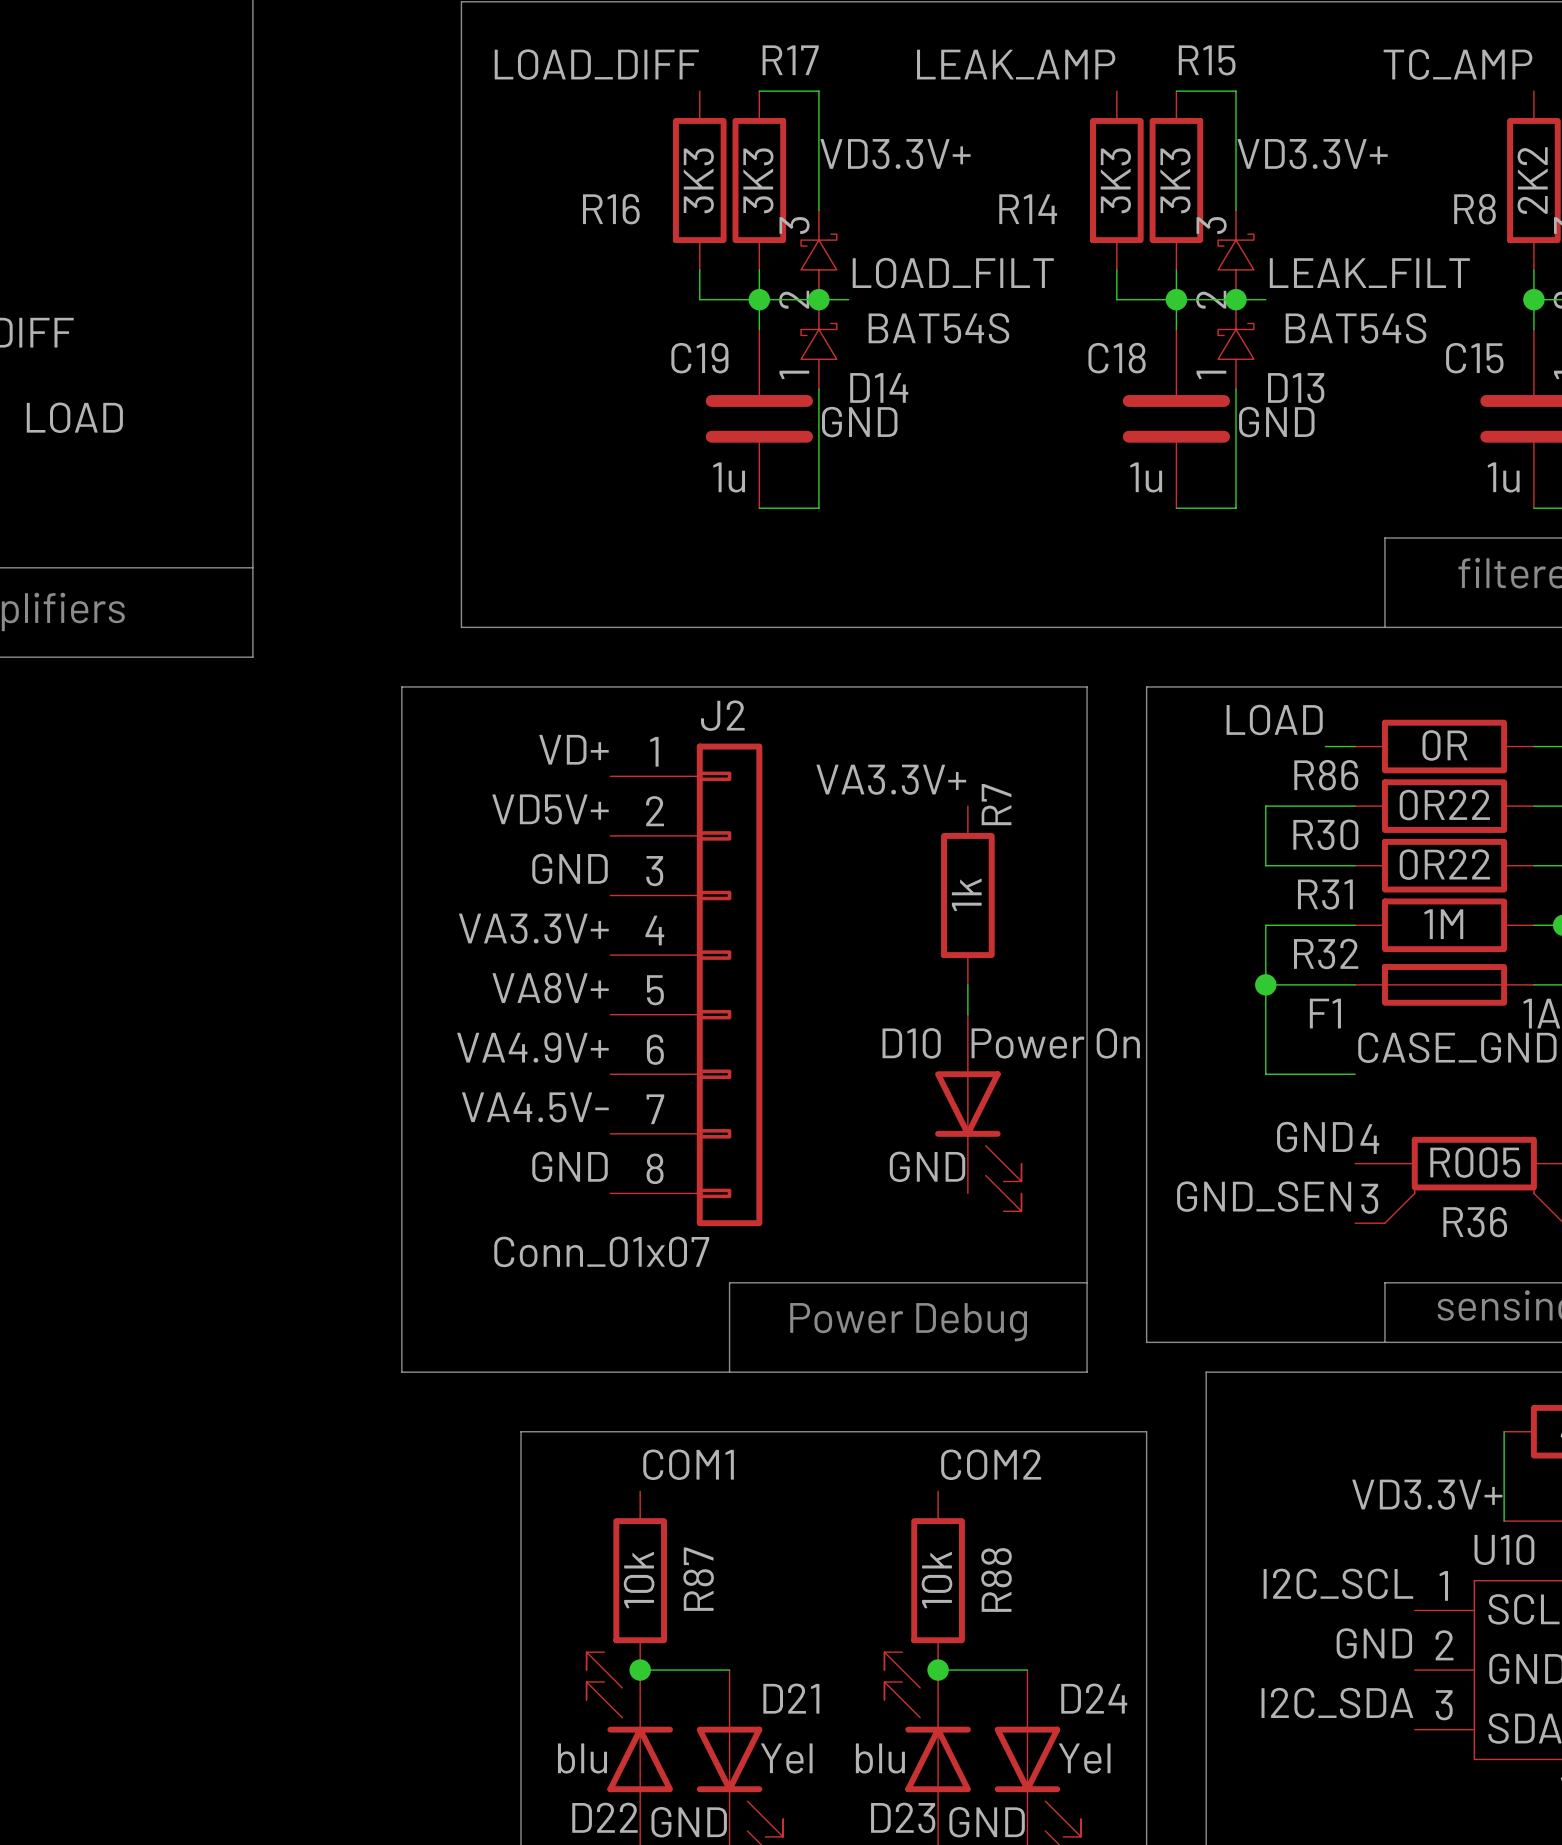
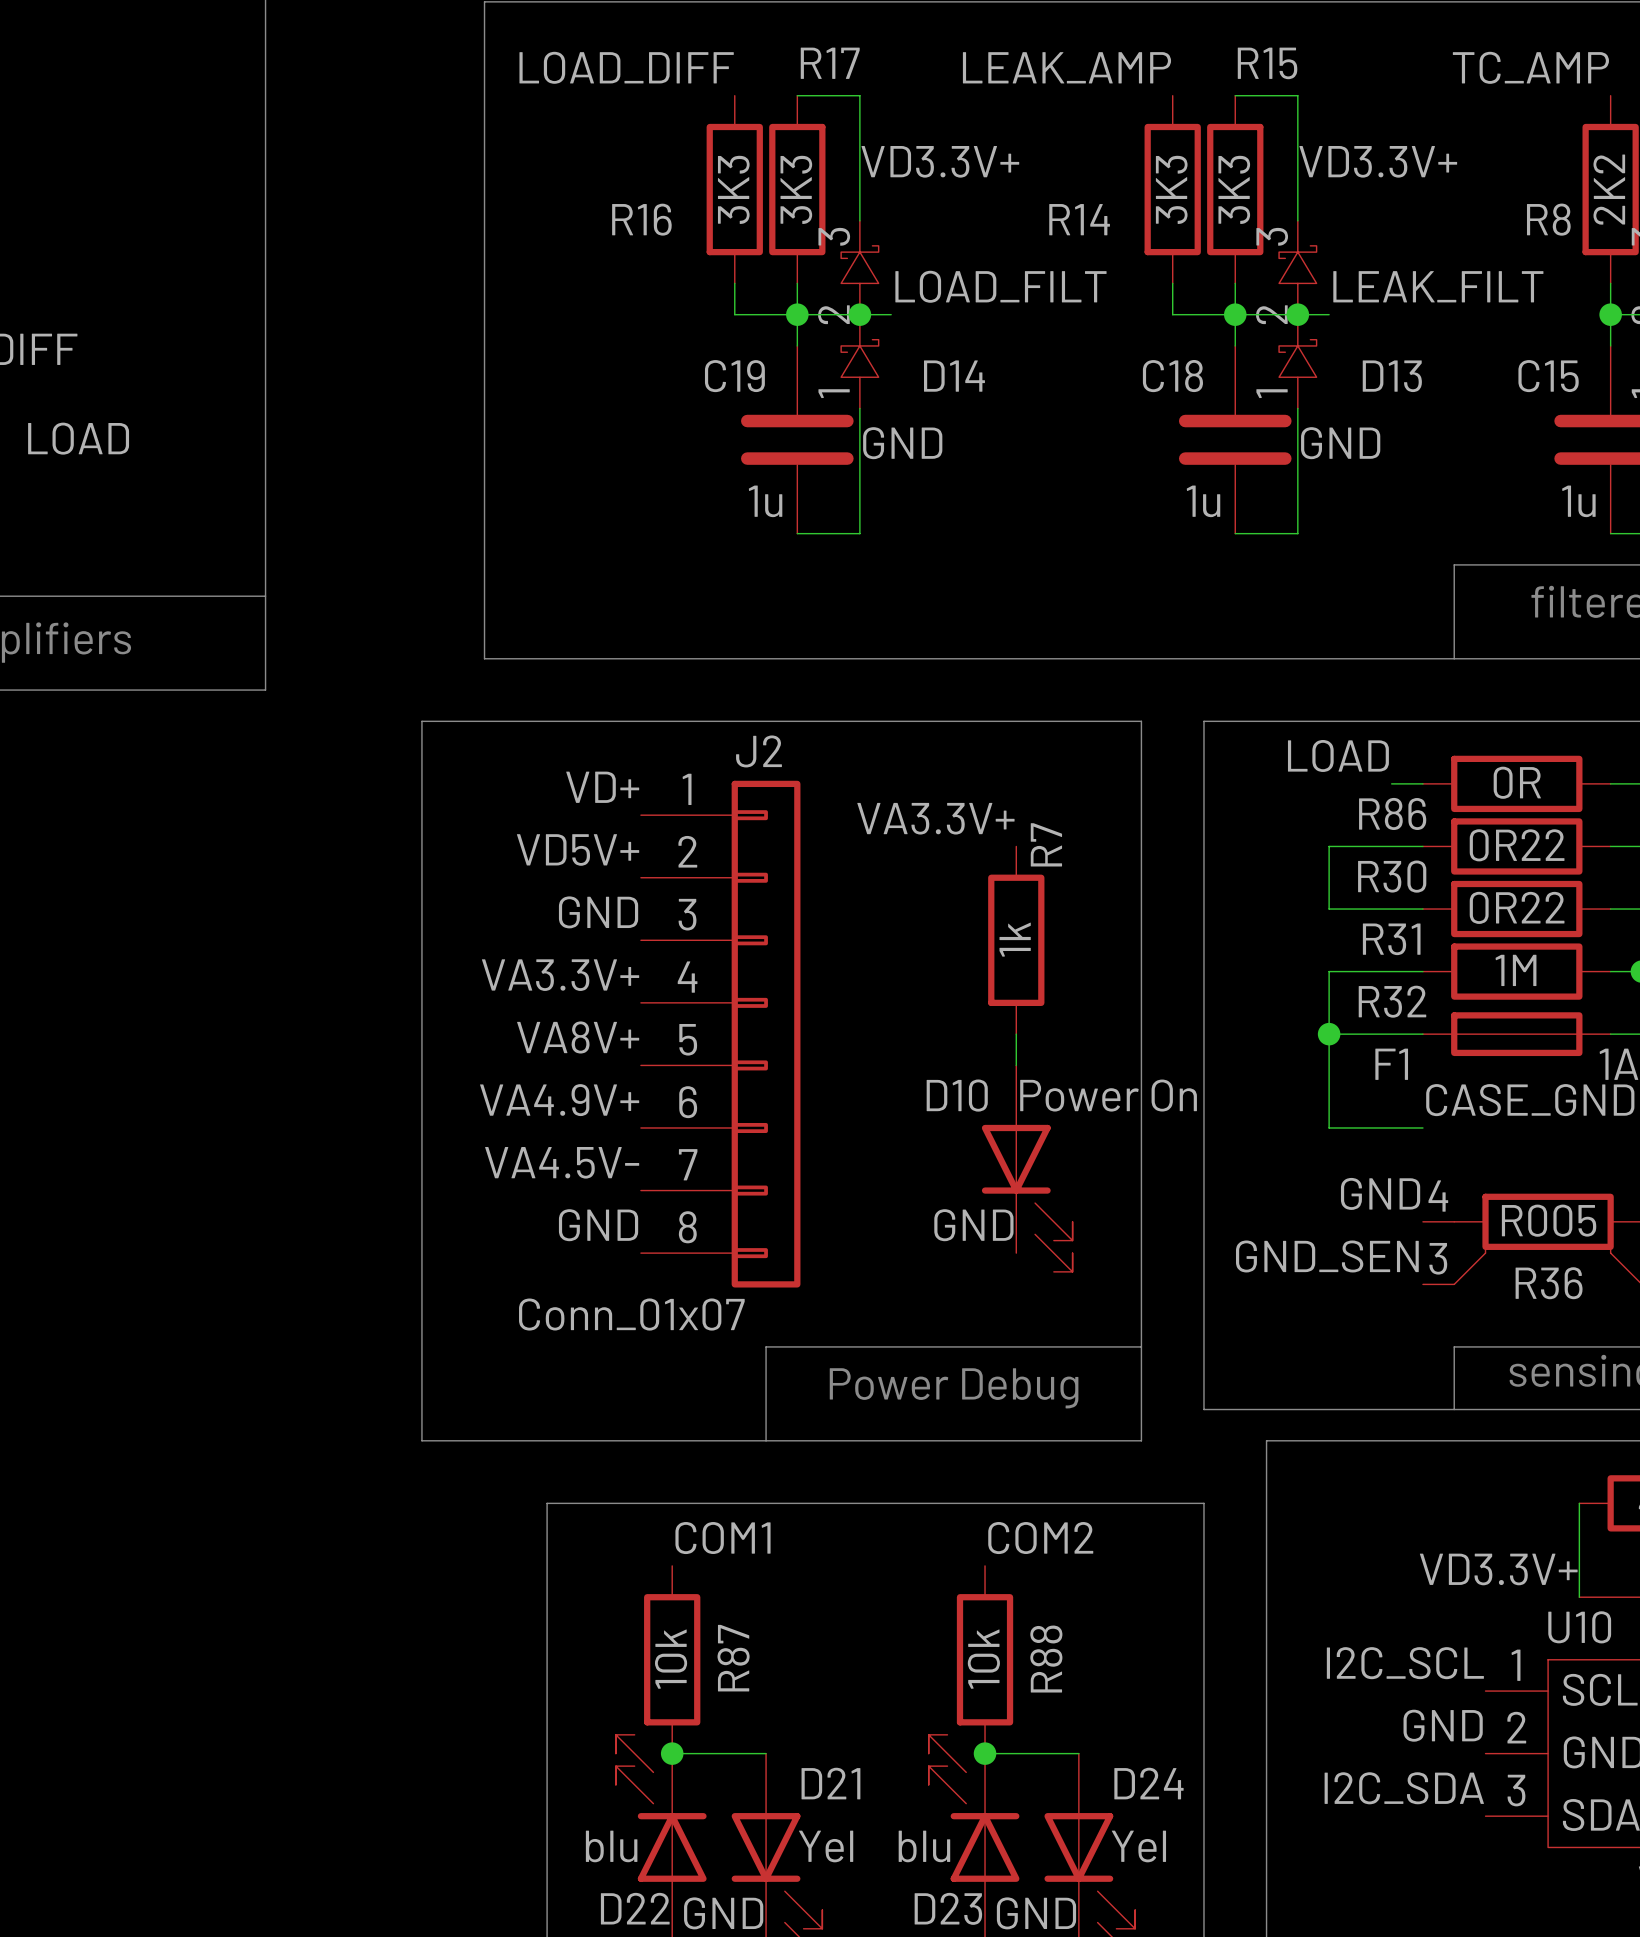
D14 value: BAT54S (938, 328) -> none
D13 value: BAT54S (1356, 328) -> none
D14 name position: D14 (879, 387) -> D14 (954, 376)
D13 name position: D13 (1296, 388) -> D13 (1392, 376)

